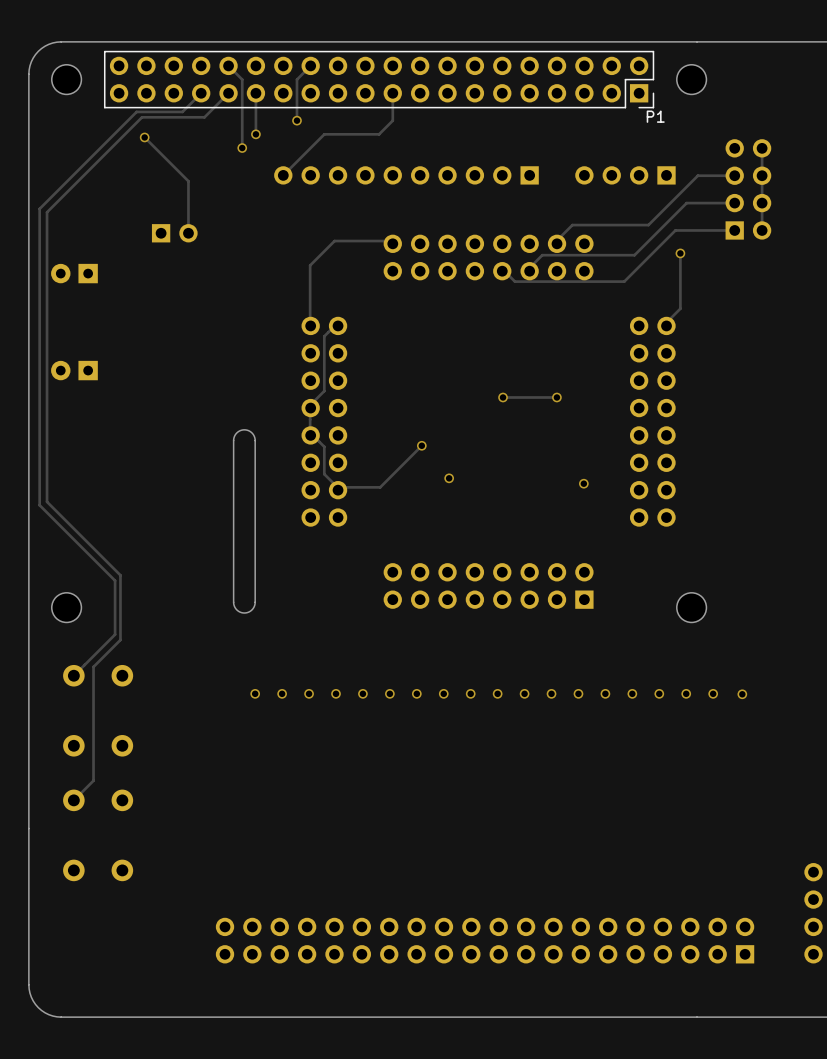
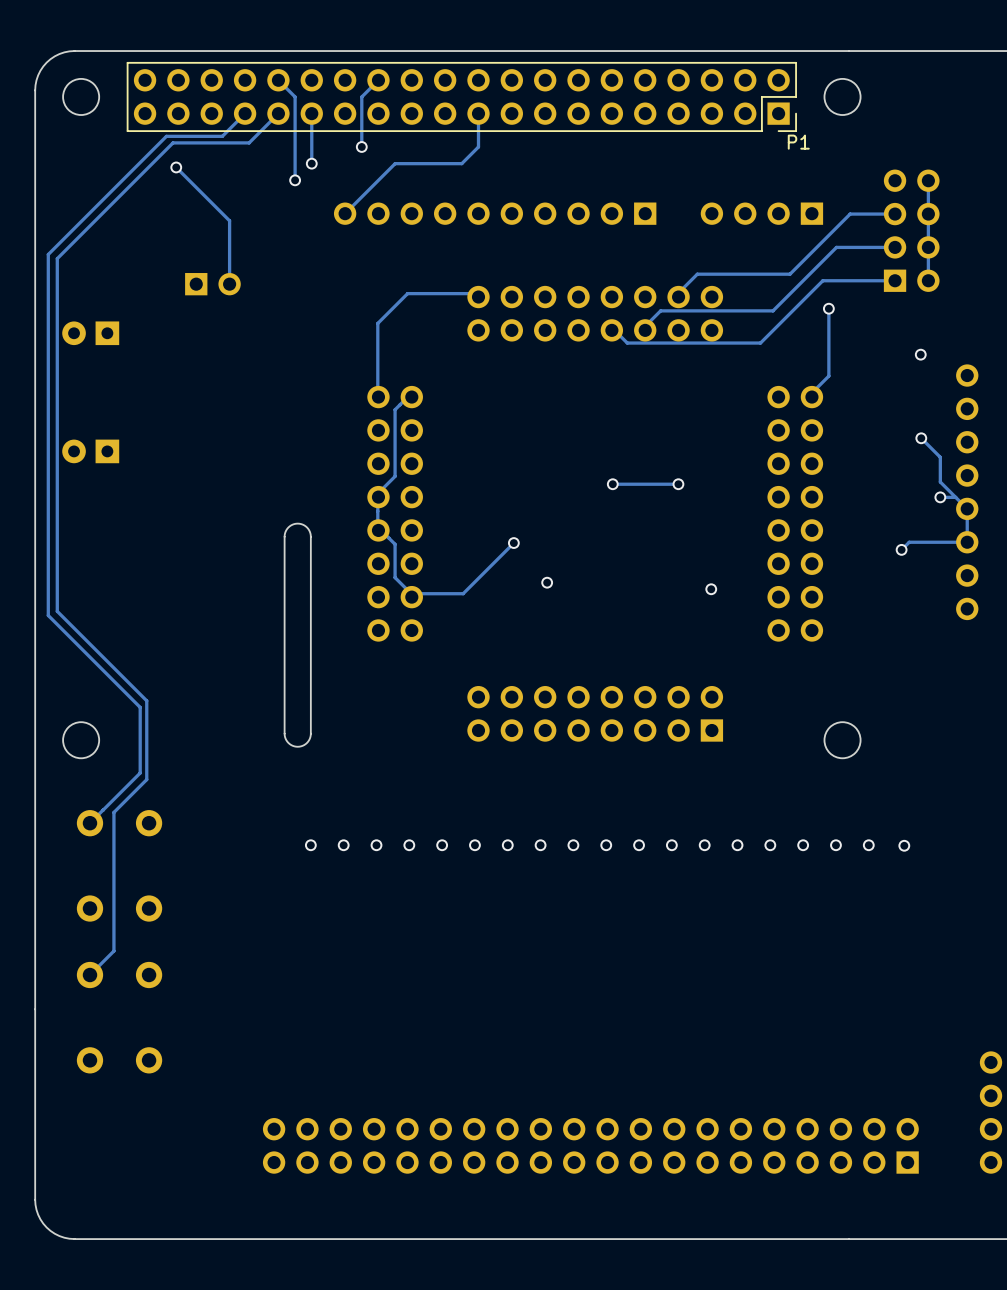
via: none -> (920, 354)
track: none -> (921, 438) (940, 457) (940, 482) (967, 508) (967, 542) (909, 542) (901, 549)
via: none -> (921, 438)
part: none -> (967, 492)
via: none -> (940, 497)
track: none -> (955, 497) (940, 497)
via: none -> (901, 549)

